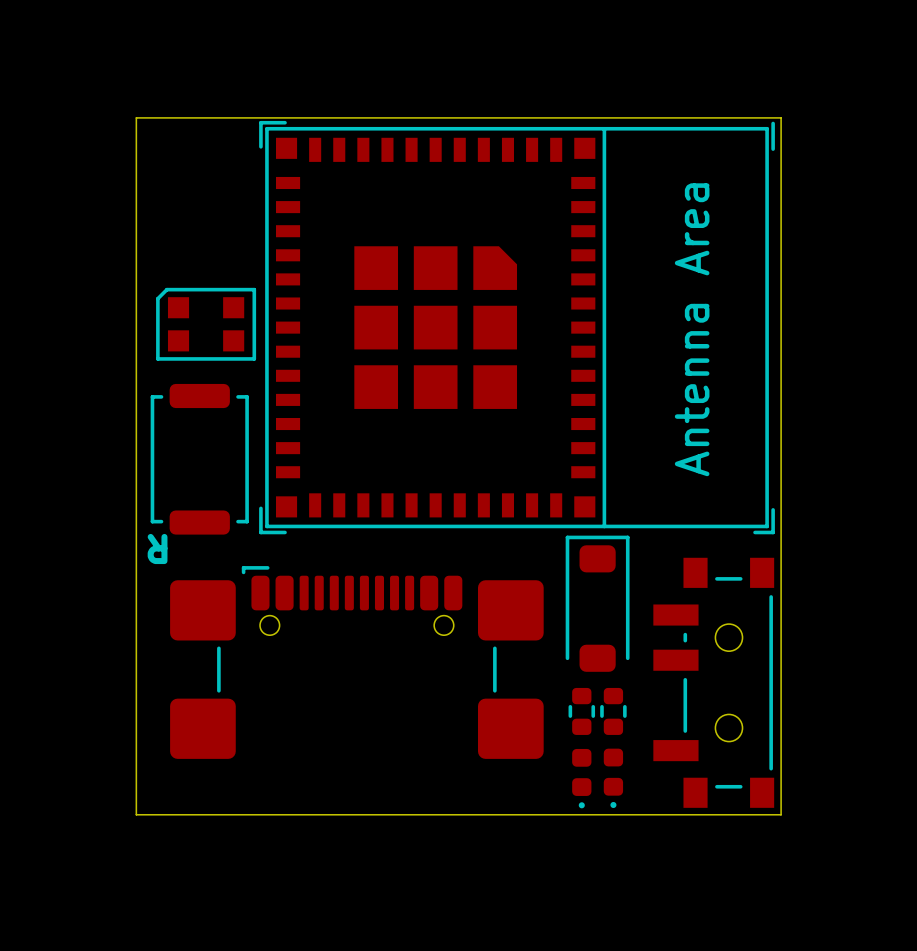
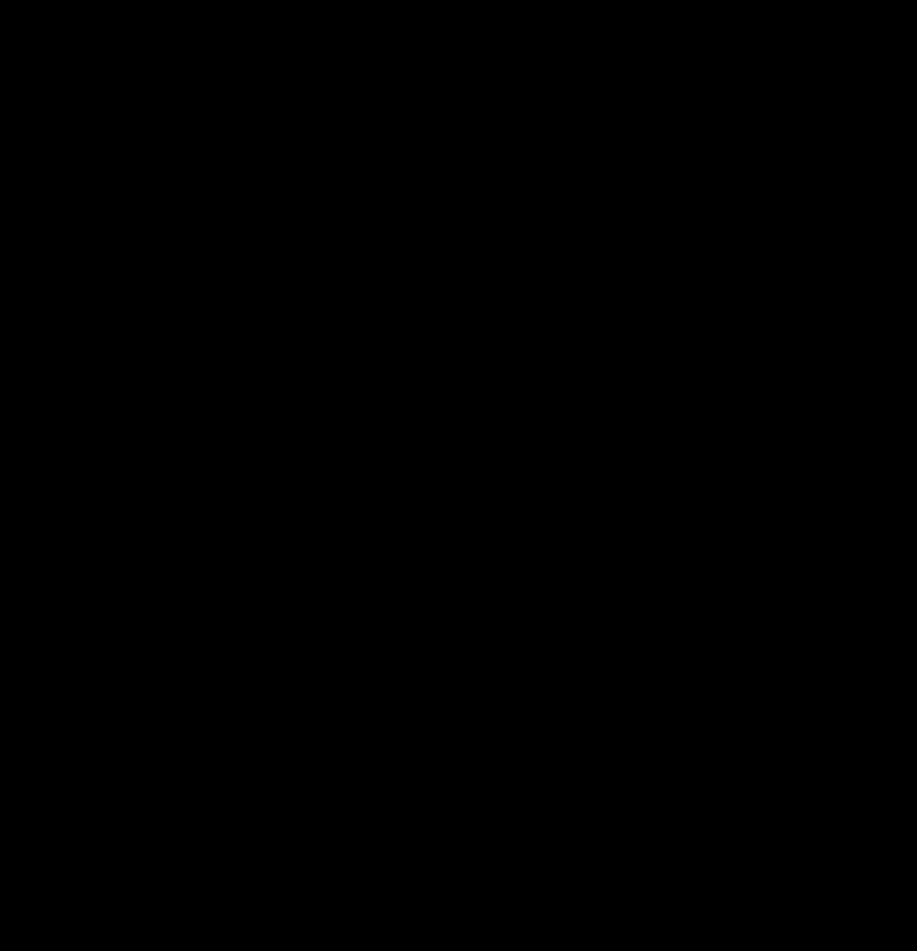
board edge: (136, 117) (136, 814) (781, 814) (781, 117) (136, 117) -> none
part: (206, 324) -> none
part: (517, 327) -> none
part: (199, 459) -> none
text: R (157, 548) -> none
part: (597, 603) -> none
part: (356, 662) -> none
part: (713, 682) -> none
part: (581, 711) -> none
part: (613, 711) -> none
part: (581, 778) -> none
part: (613, 778) -> none

